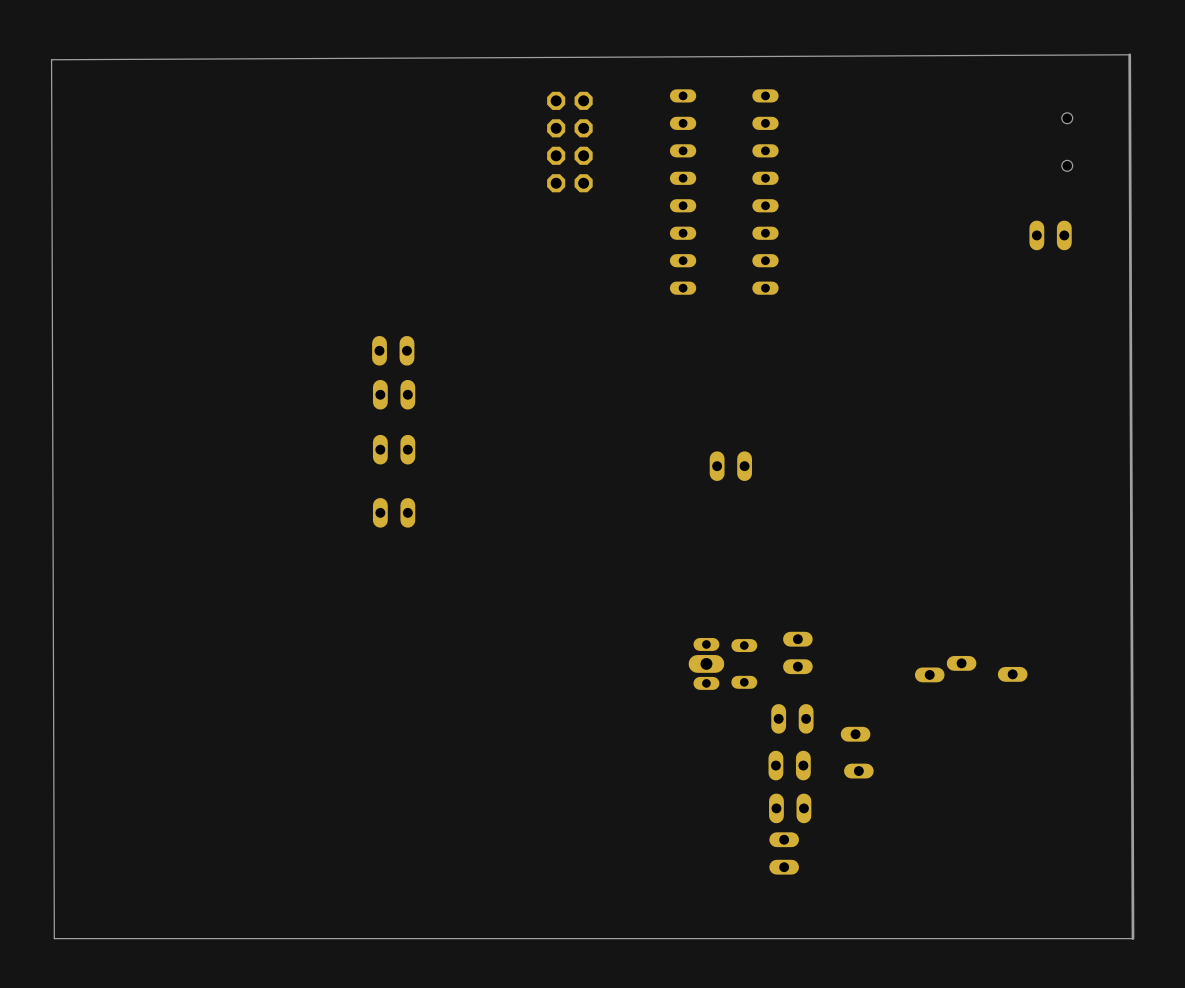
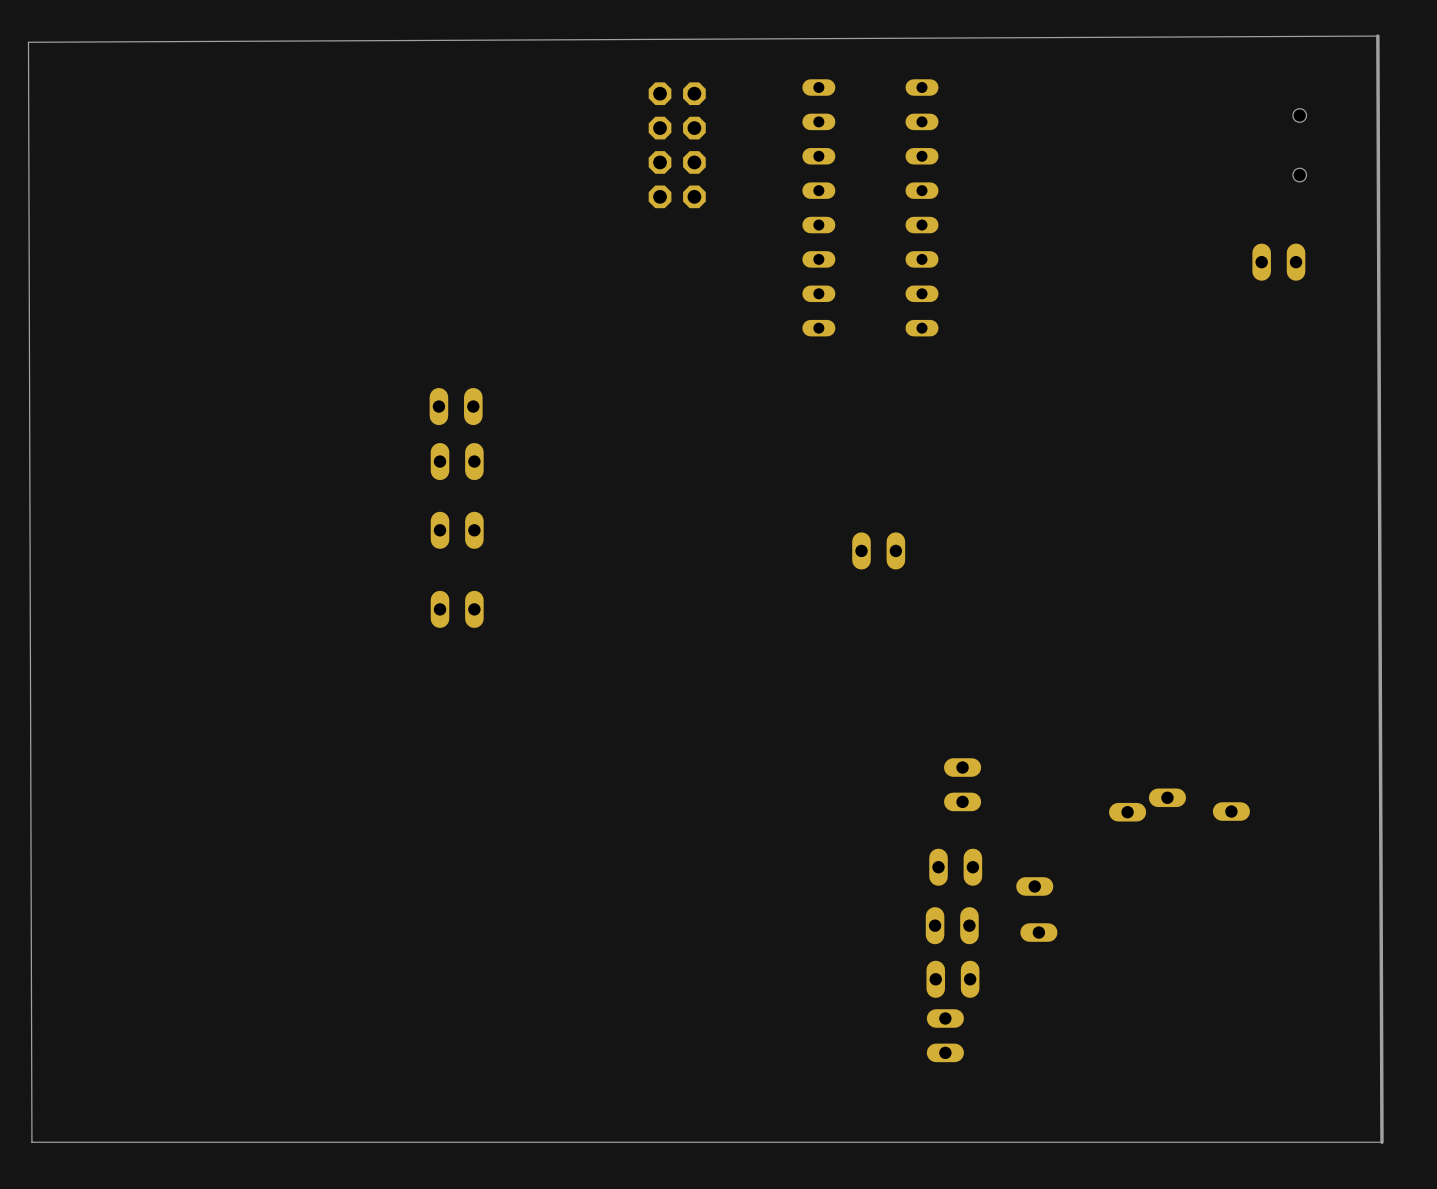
part: (722, 663) -> none

